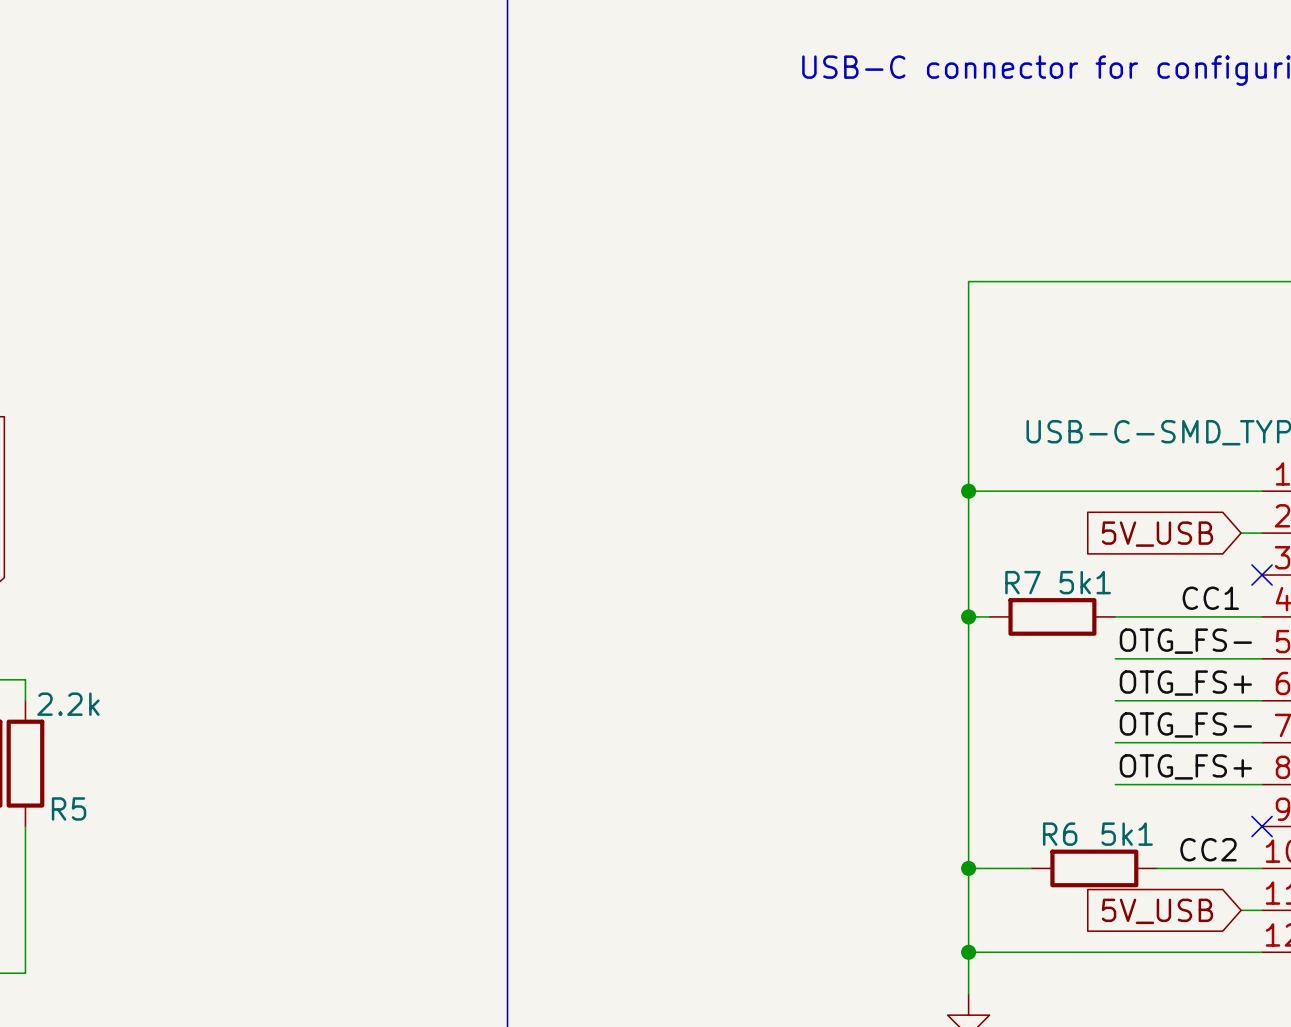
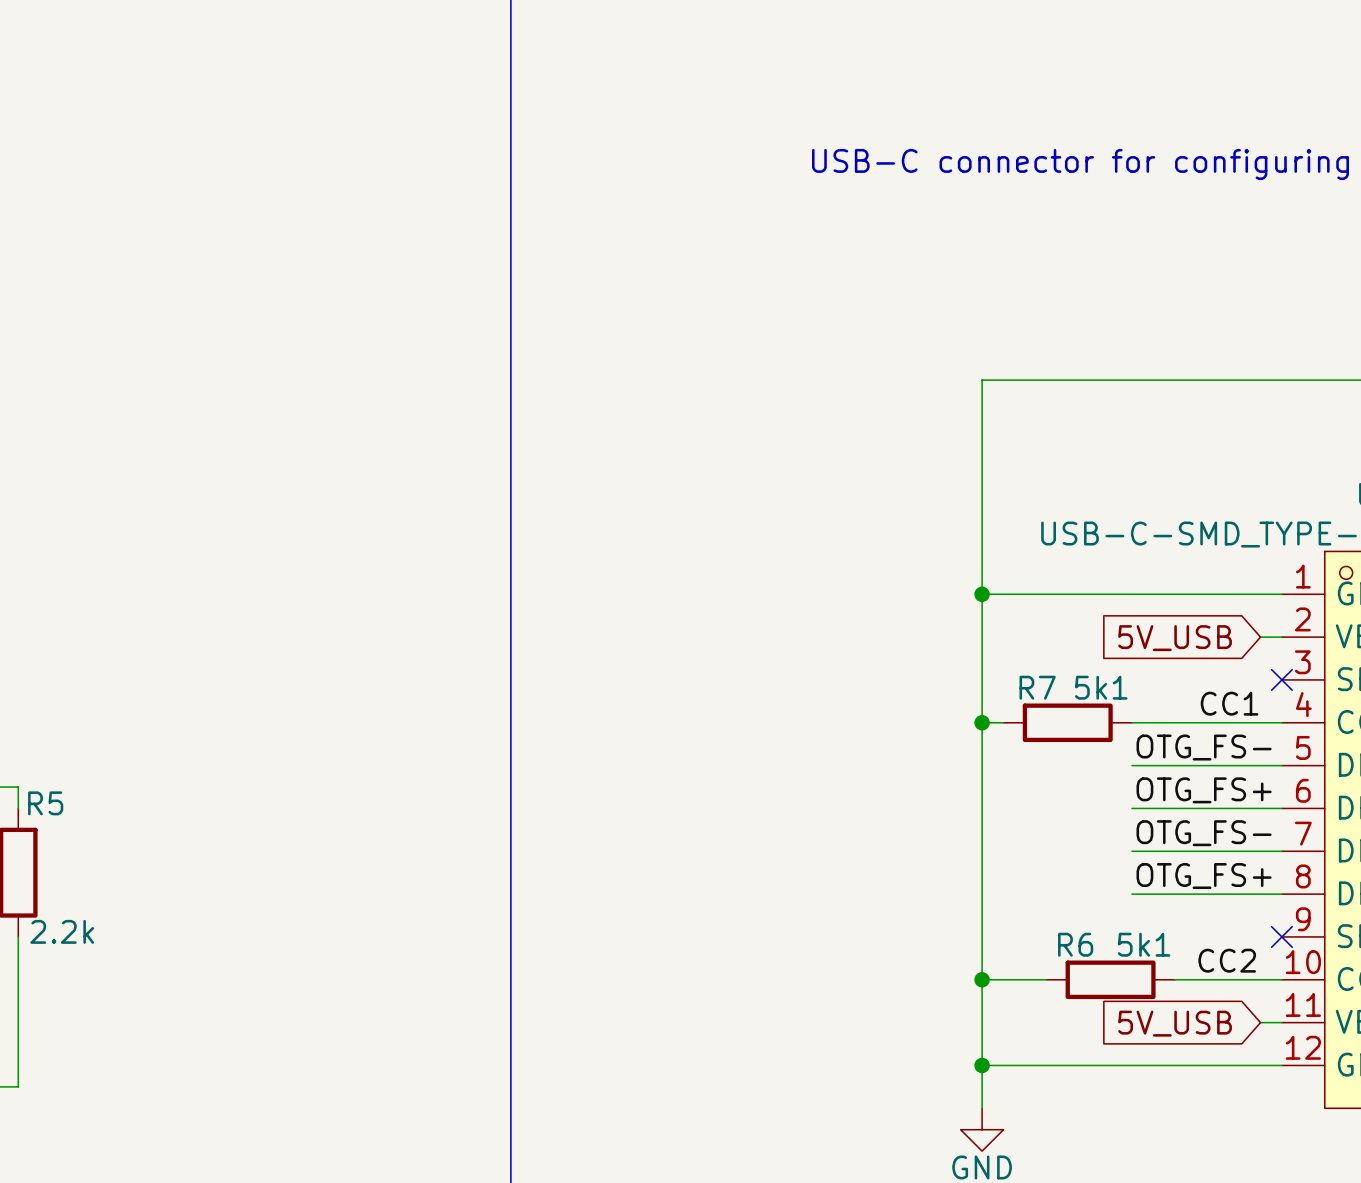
R5 value position: 2.2k (68, 704) -> 2.2k (62, 931)
R5 name position: R5 (69, 808) -> R5 (45, 803)

